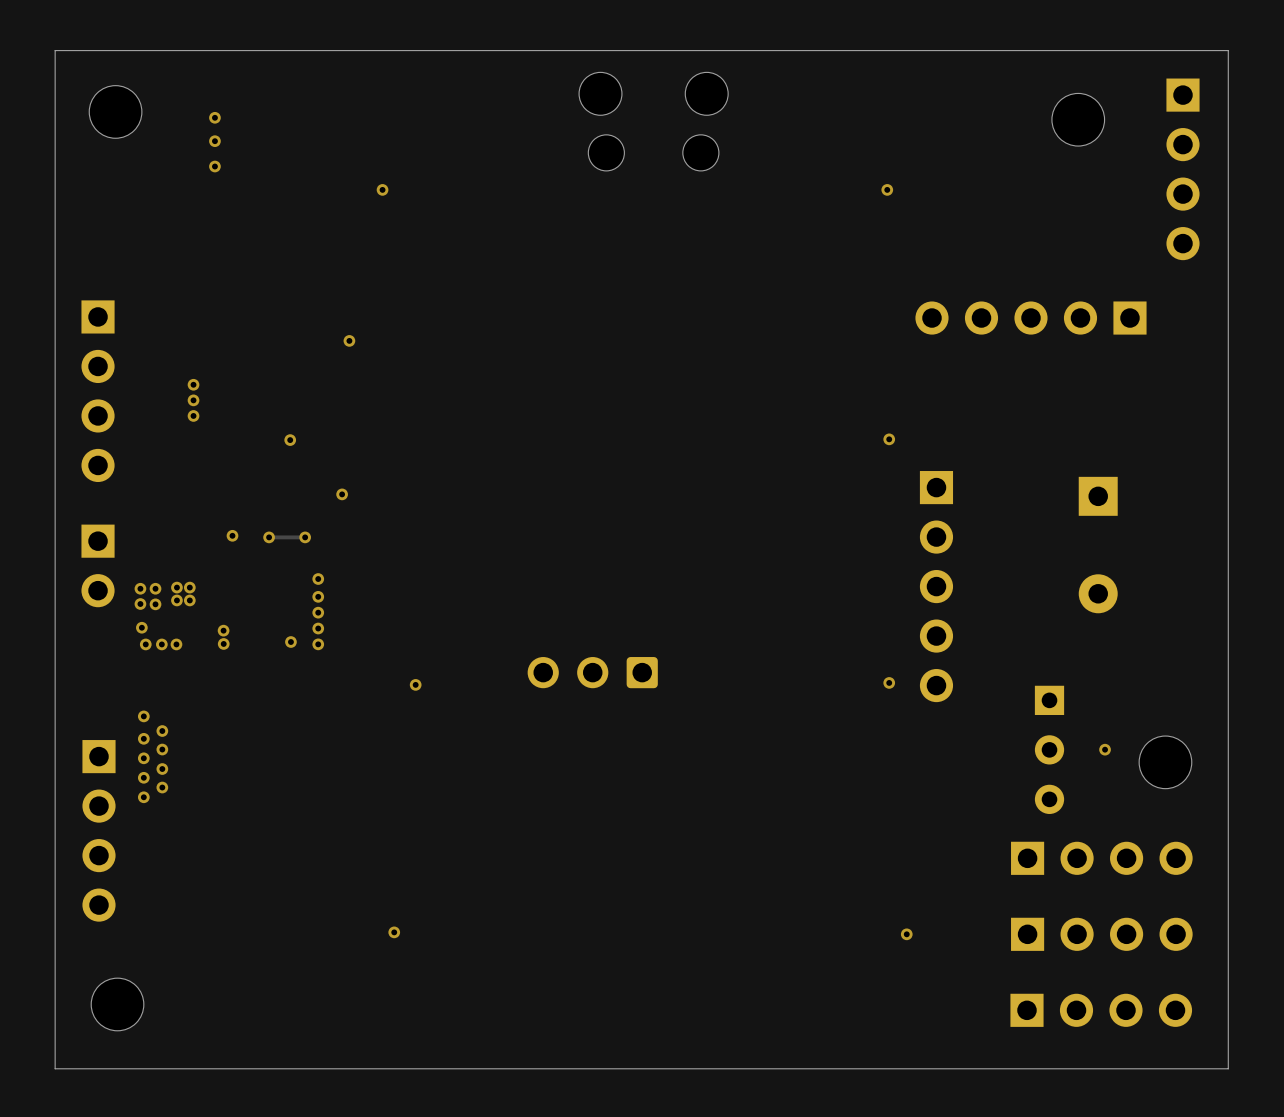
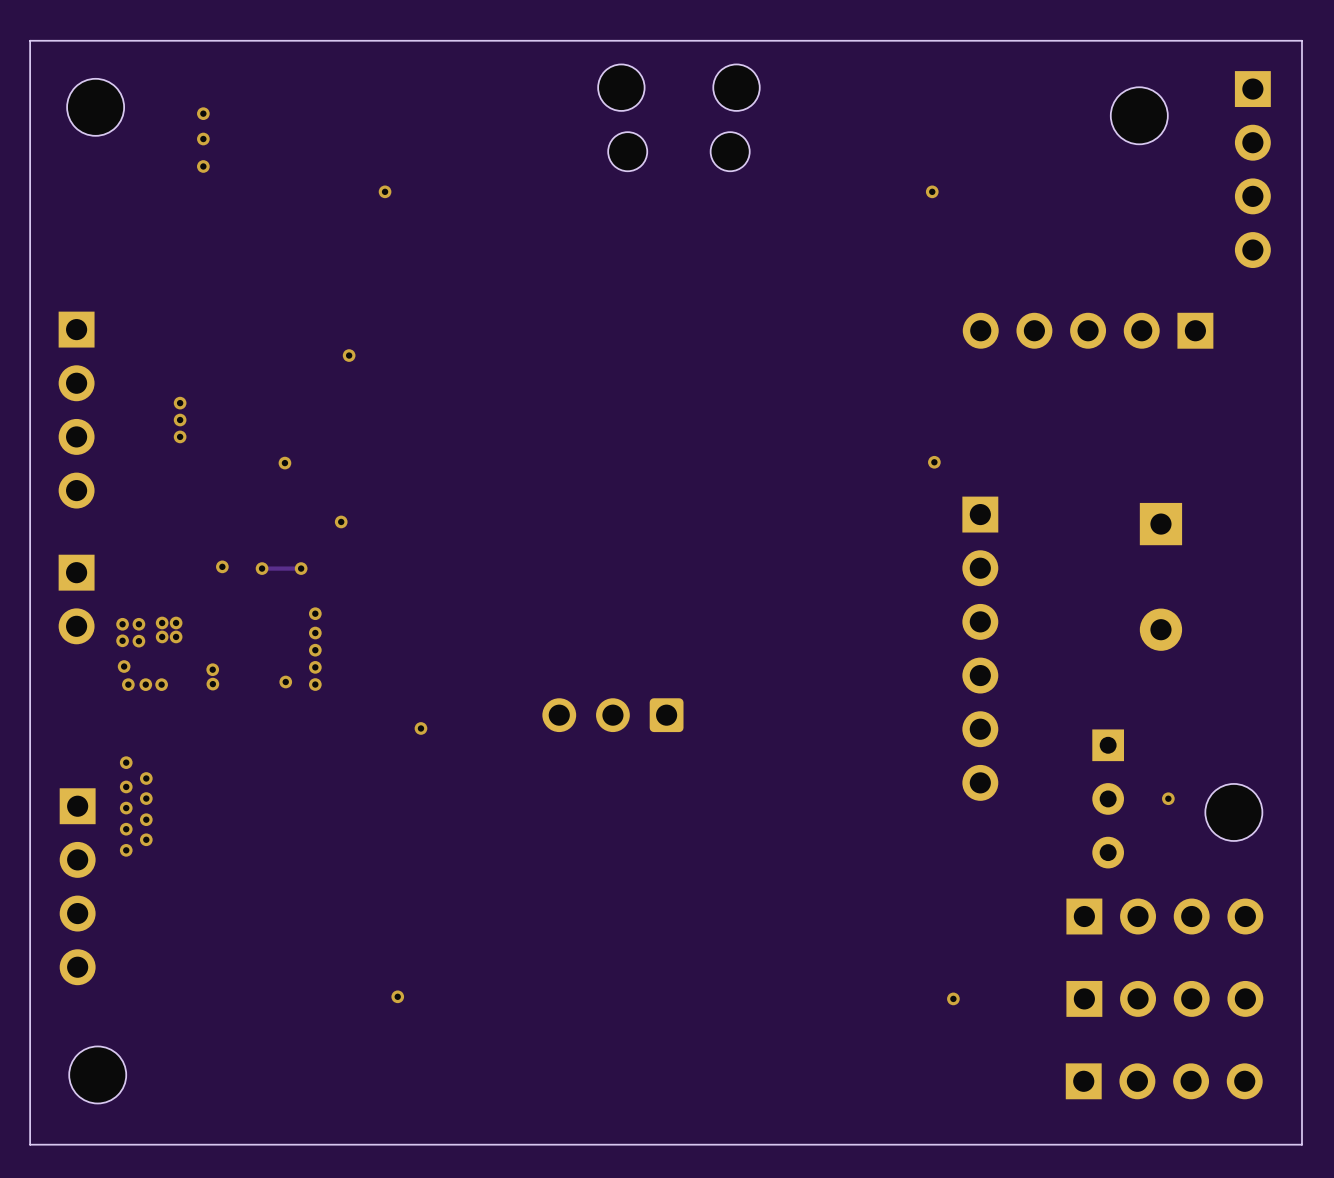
part: (936, 586) -> none
part: none -> (980, 648)
via: (889, 682) -> none

